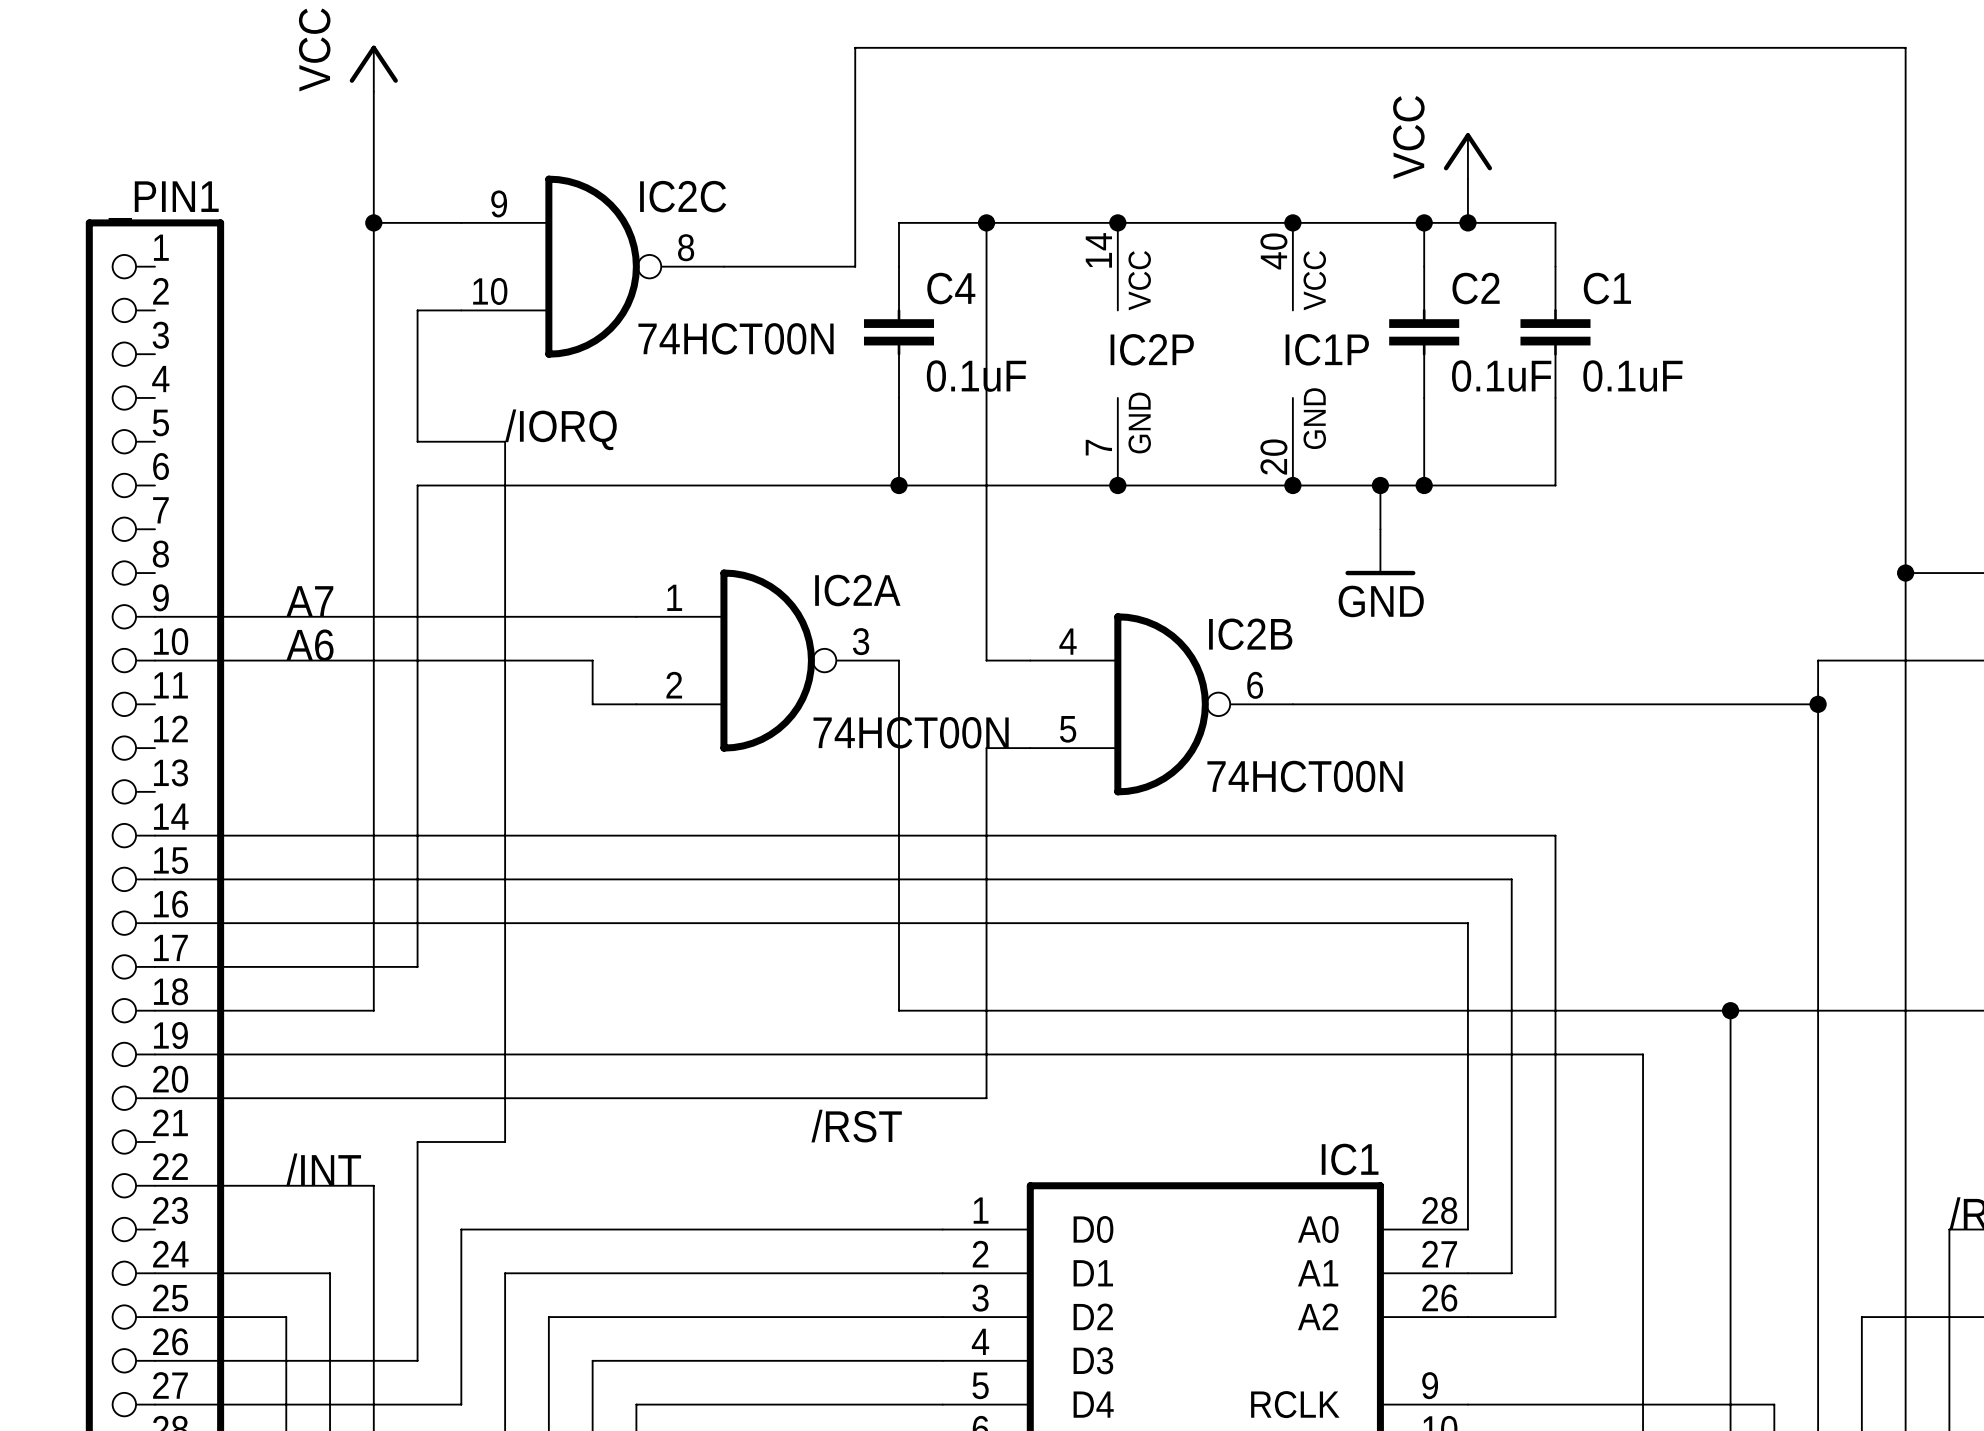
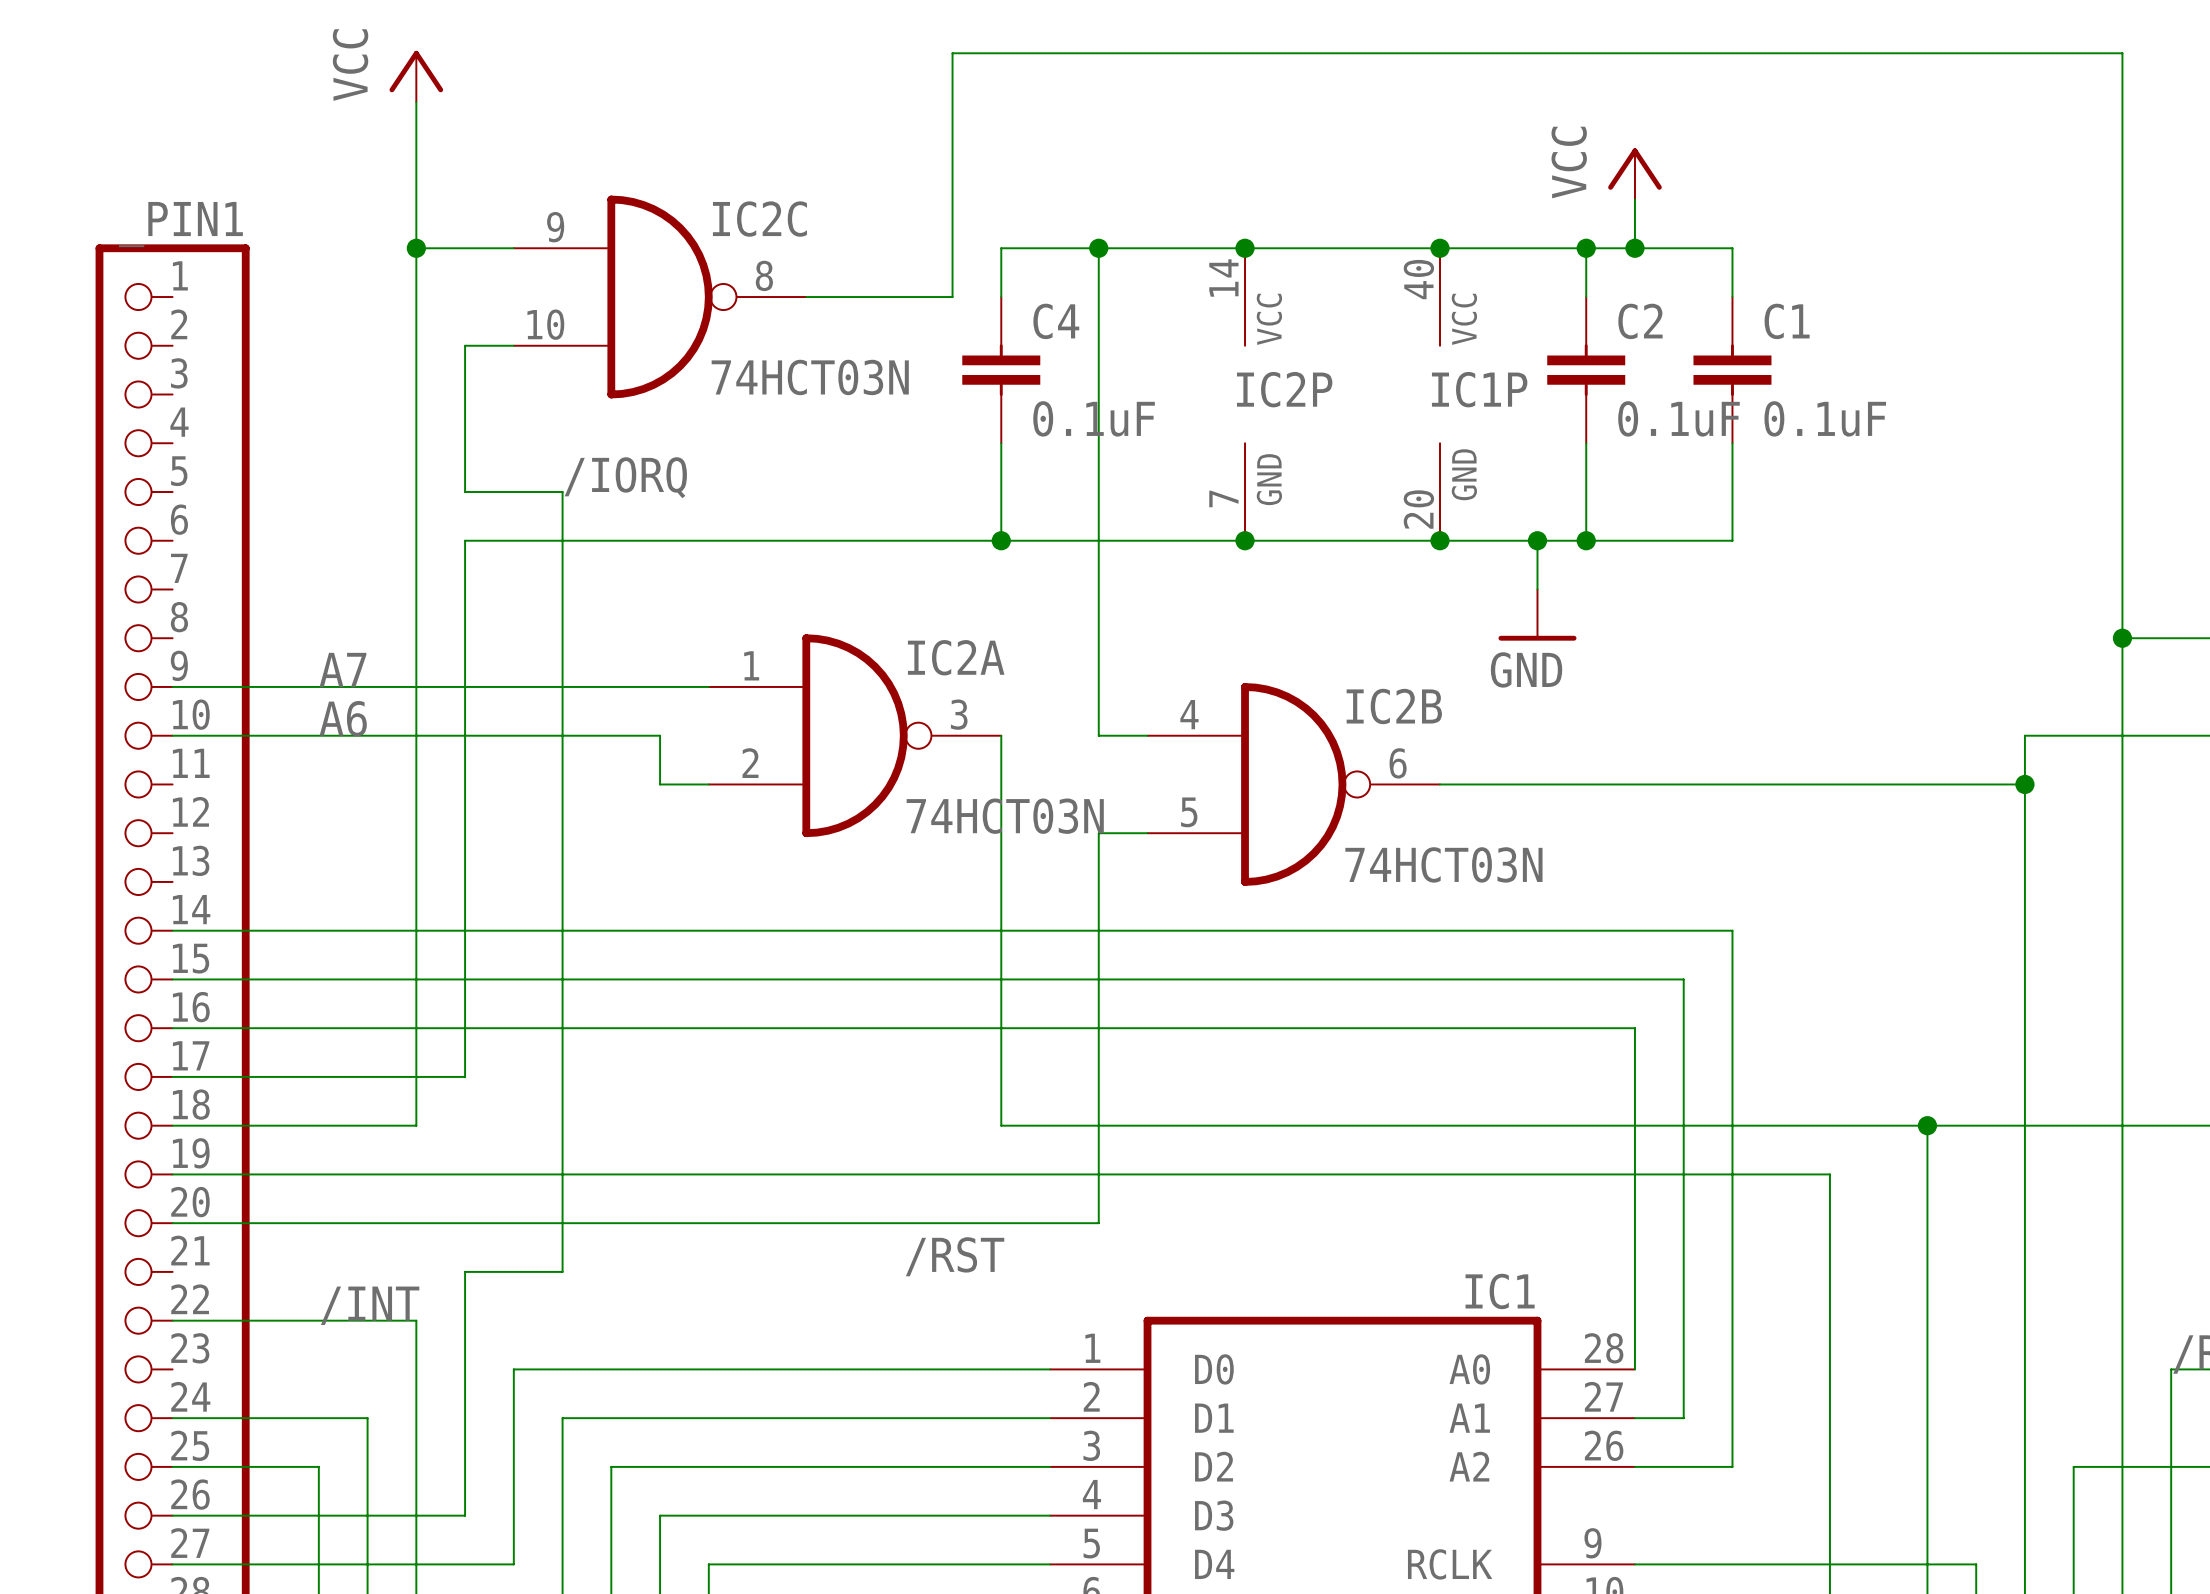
IC2C value: 74HCT00N (736, 338) -> 74HCT03N (810, 377)
IC2A value: 74HCT00N (911, 732) -> 74HCT03N (1005, 816)
IC2B value: 74HCT00N (1304, 776) -> 74HCT03N (1443, 864)

